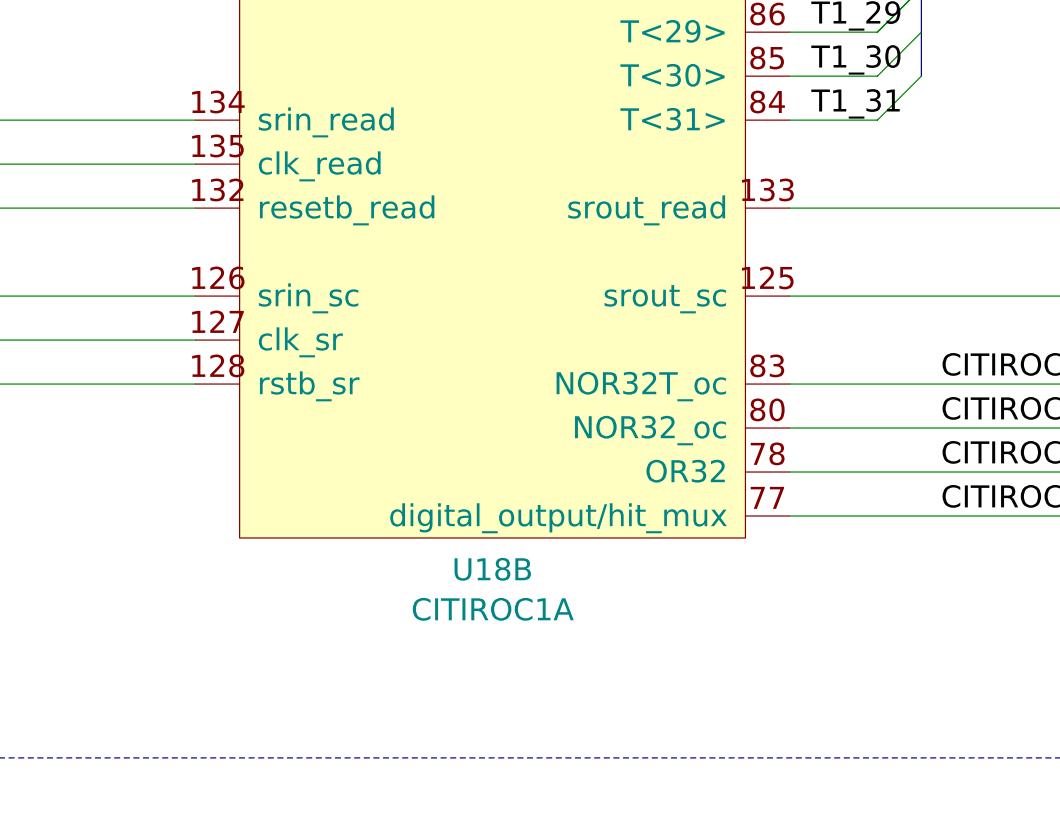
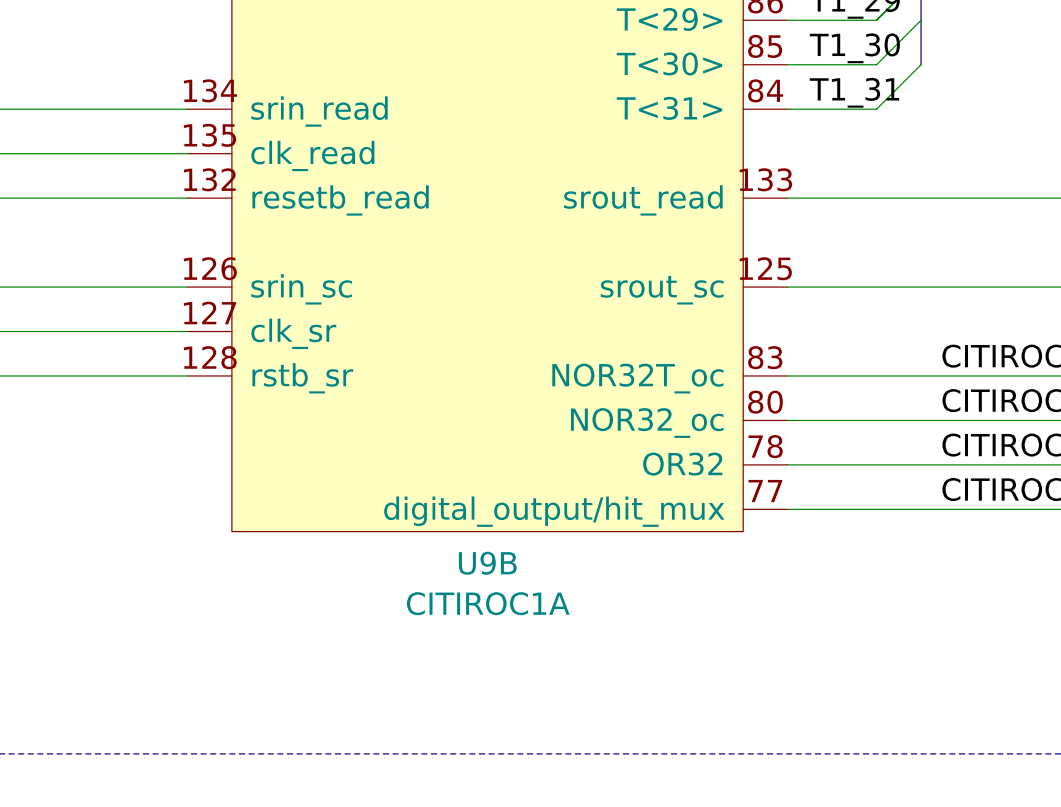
U18B name: U18B (492, 569) -> U9B (487, 563)

